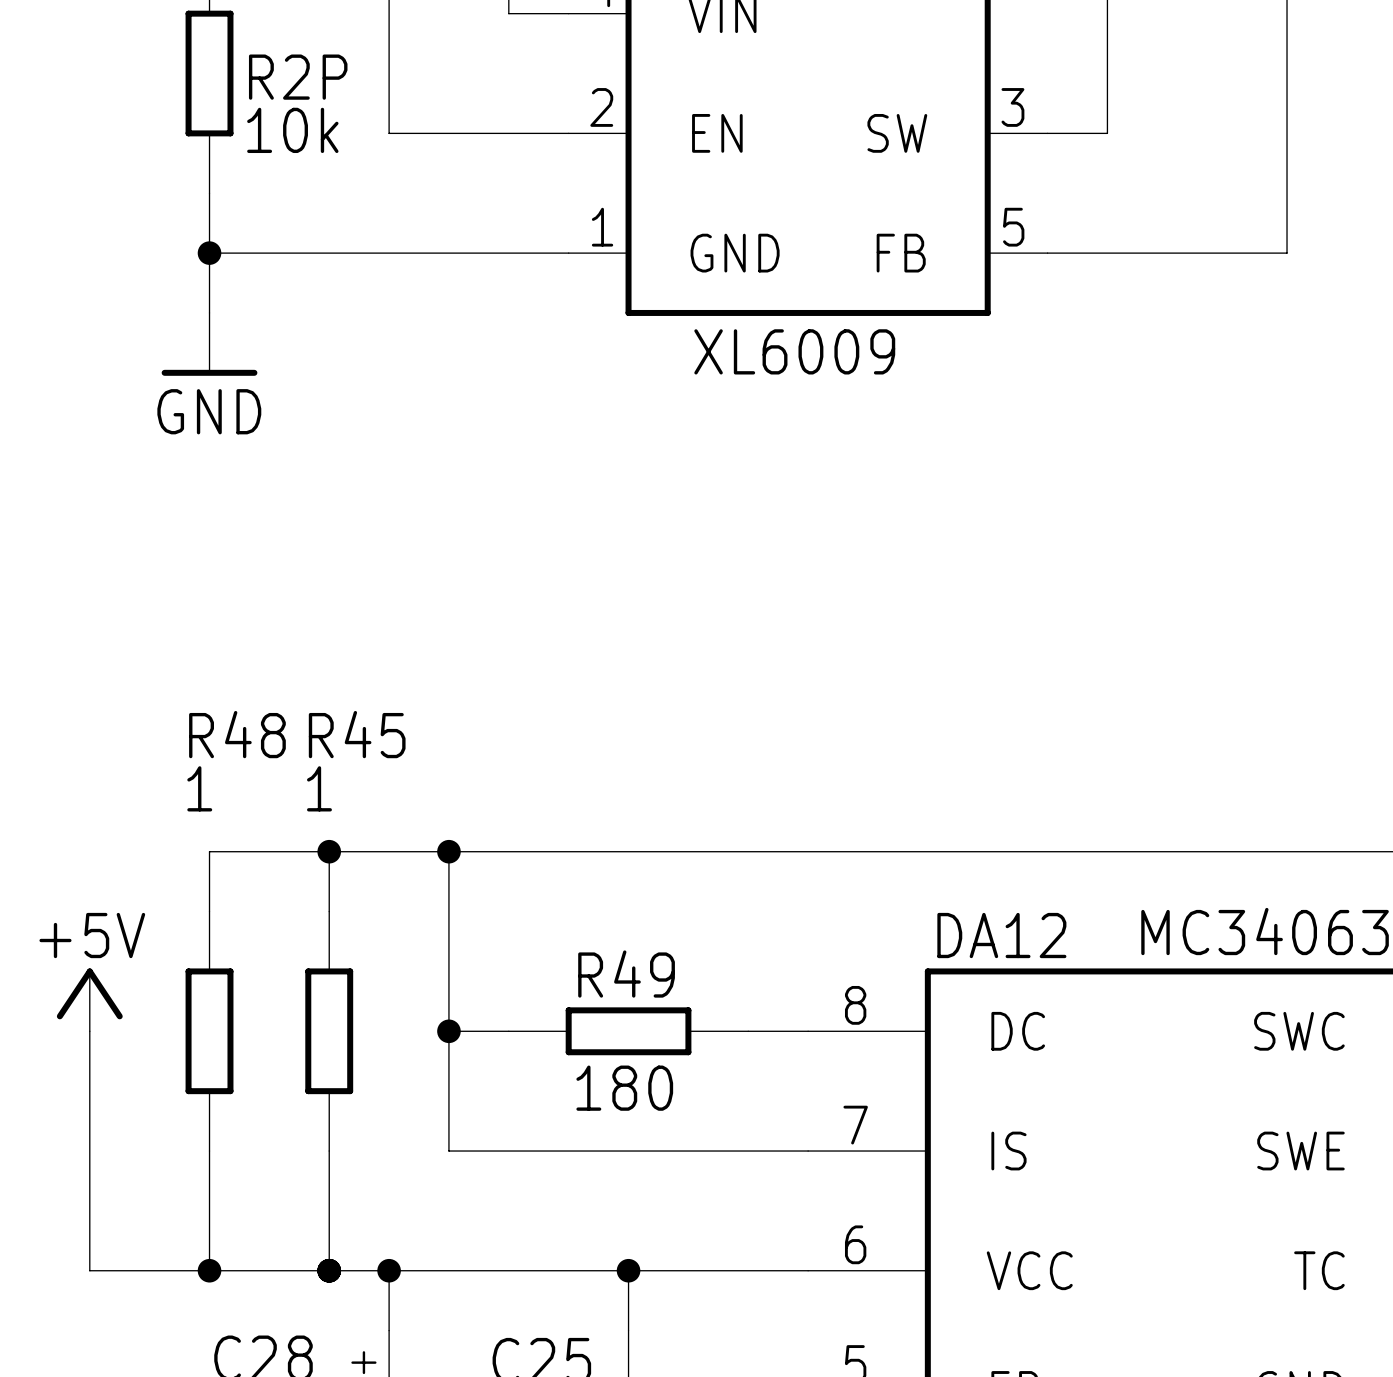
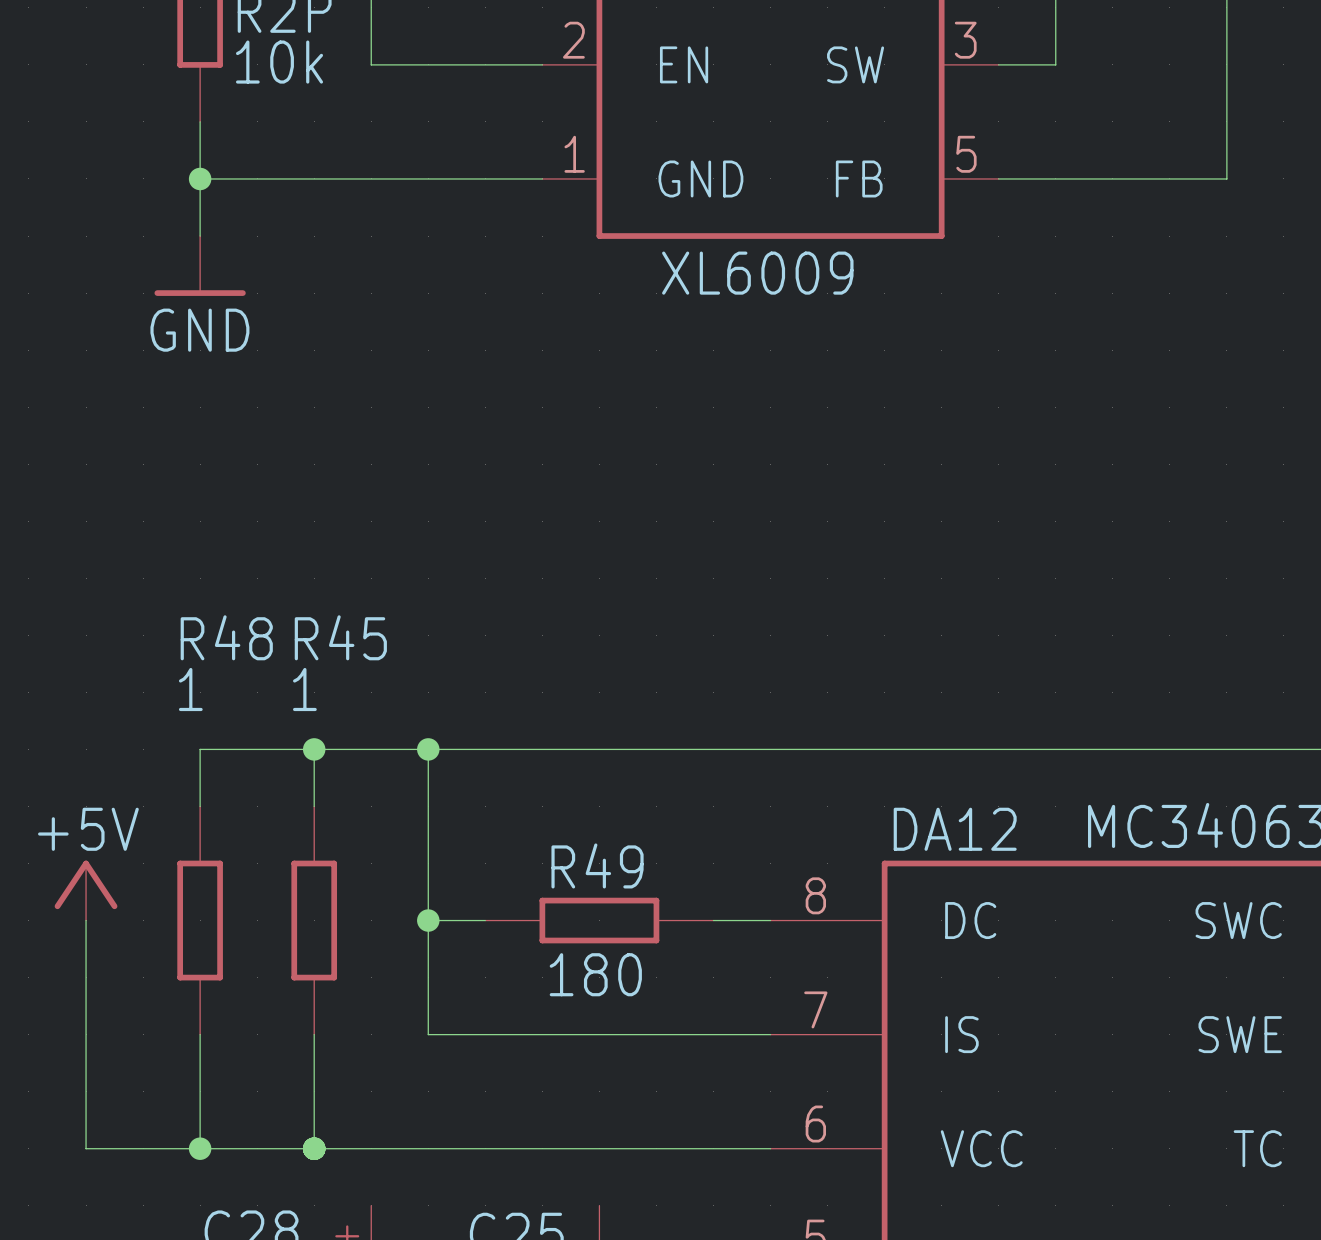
wire: (389, 1270) (389, 1330) -> none
junction: (389, 1270) -> none
wire: (628, 1270) (628, 1330) -> none
junction: (628, 1270) -> none

